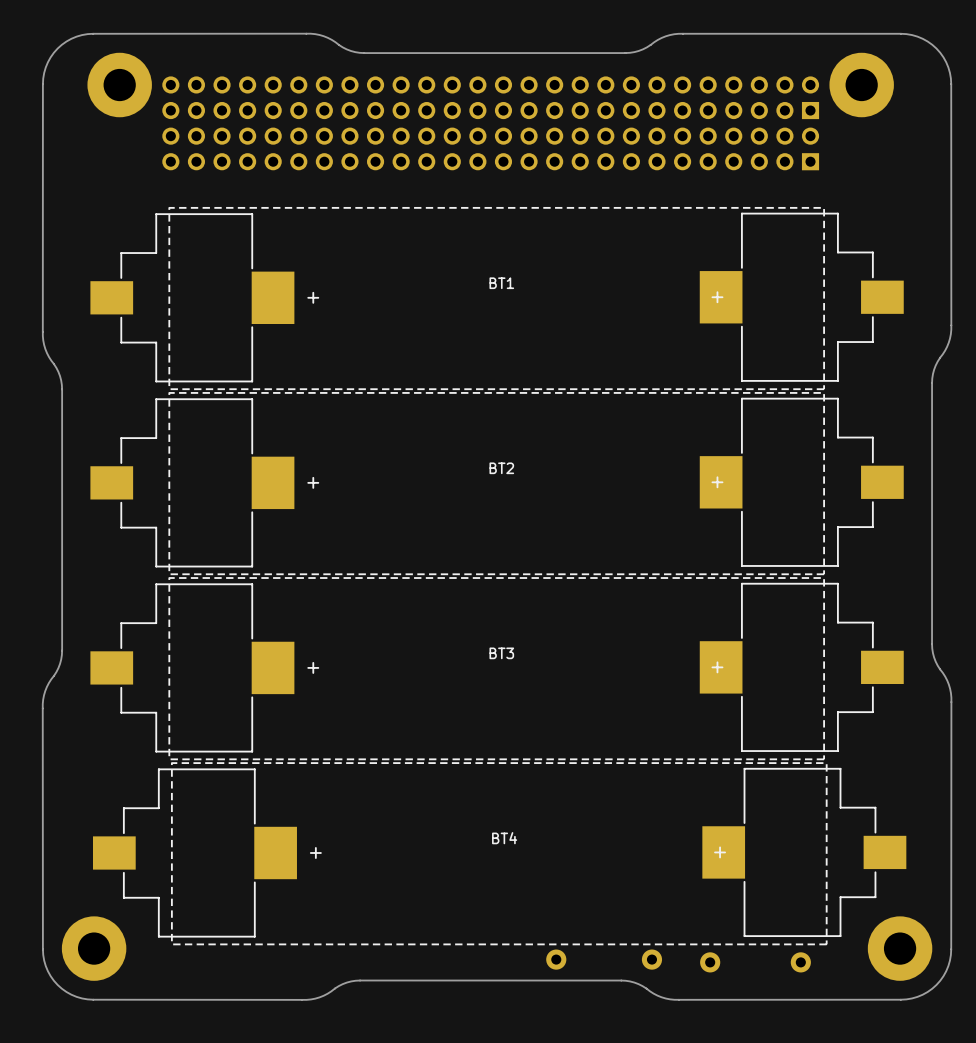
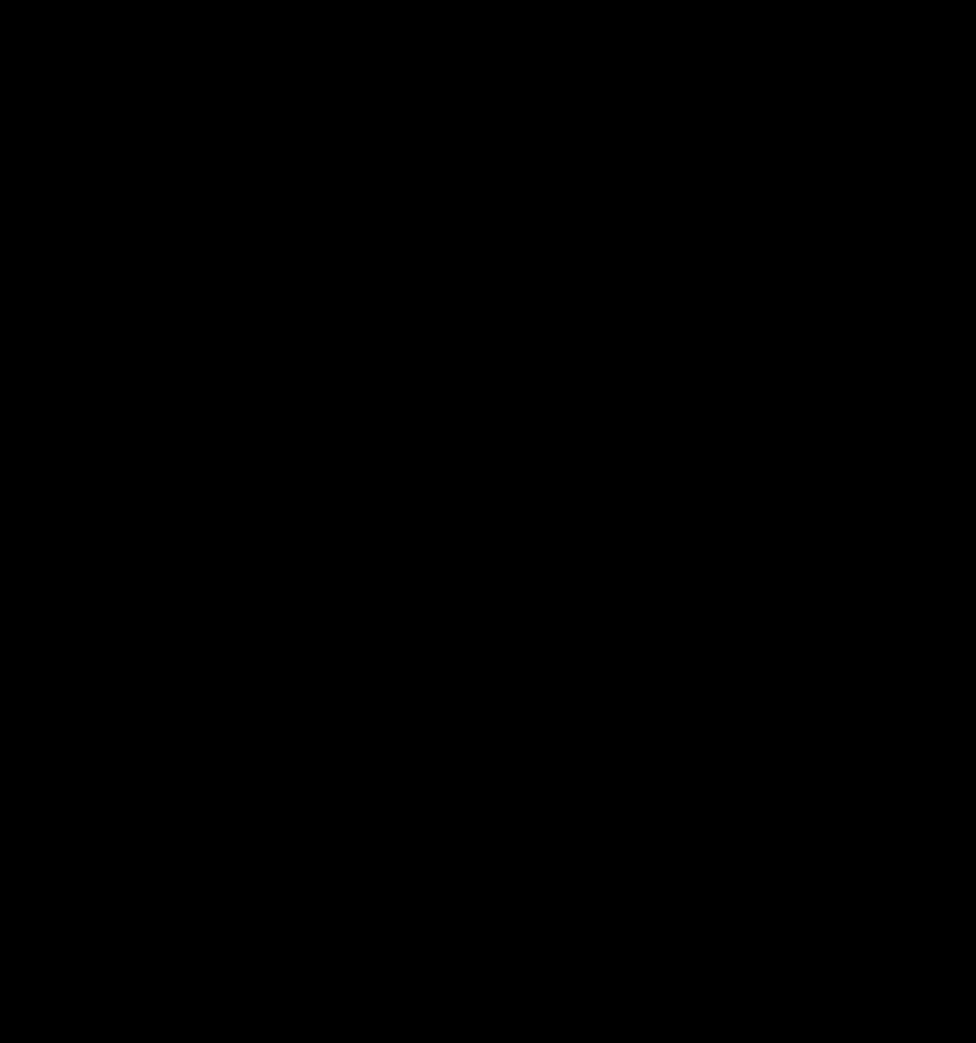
board edge: (650, 44) (638, 50) (625, 53) (364, 53) (351, 51) (327, 37) (310, 33) (93, 33) (71, 38) (61, 44) (50, 57) (44, 72) (42, 84) (42, 336) (47, 353) (54, 364) -> none
board edge: (650, 45) (665, 36) (678, 33) (900, 33) (922, 38) (936, 48) (946, 62) (951, 84) (951, 329) (948, 342) (940, 357) -> none
part: (119, 85) -> none
part: (861, 85) -> none
part: (490, 97) -> none
part: (490, 148) -> none
BT1: (497, 298) -> none
board edge: (940, 357) (934, 369) (932, 382) (932, 644) (934, 657) (947, 680) (951, 697) (951, 949) (946, 971) (940, 980) (927, 991) (906, 999) (674, 999) (661, 997) (646, 988) -> none
board edge: (54, 364) (60, 376) (62, 389) (62, 650) (60, 663) (46, 686) (42, 704) (42, 949) (47, 971) (57, 984) (71, 994) (93, 999) (306, 999) (323, 995) (346, 982) (360, 980) (621, 980) (634, 982) (646, 988) -> none
BT2: (497, 483) -> none
BT3: (497, 668) -> none
BT4: (499, 853) -> none
part: (94, 948) -> none
part: (900, 948) -> none
part: (556, 959) -> none
part: (651, 959) -> none
part: (710, 962) -> none
part: (800, 962) -> none

